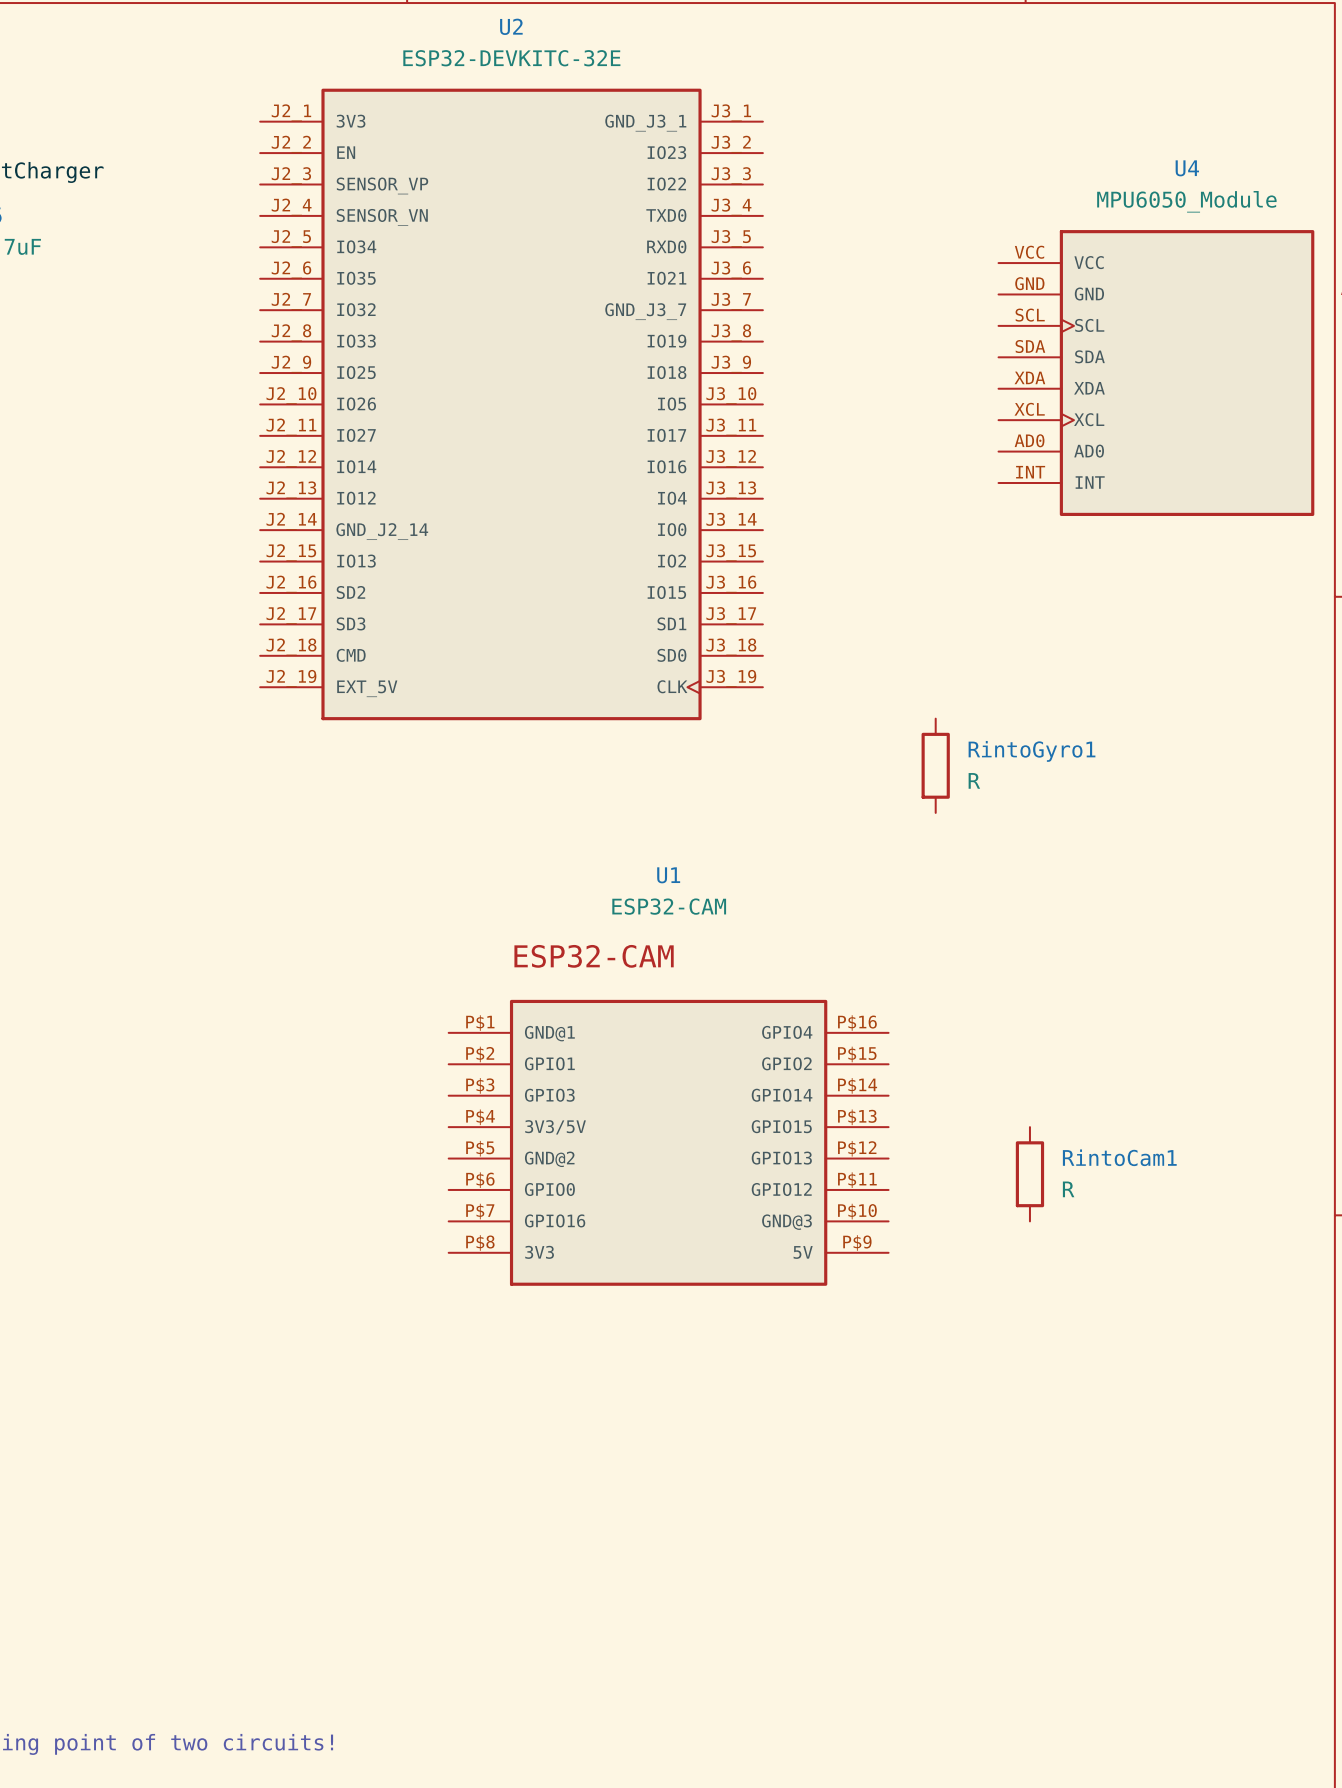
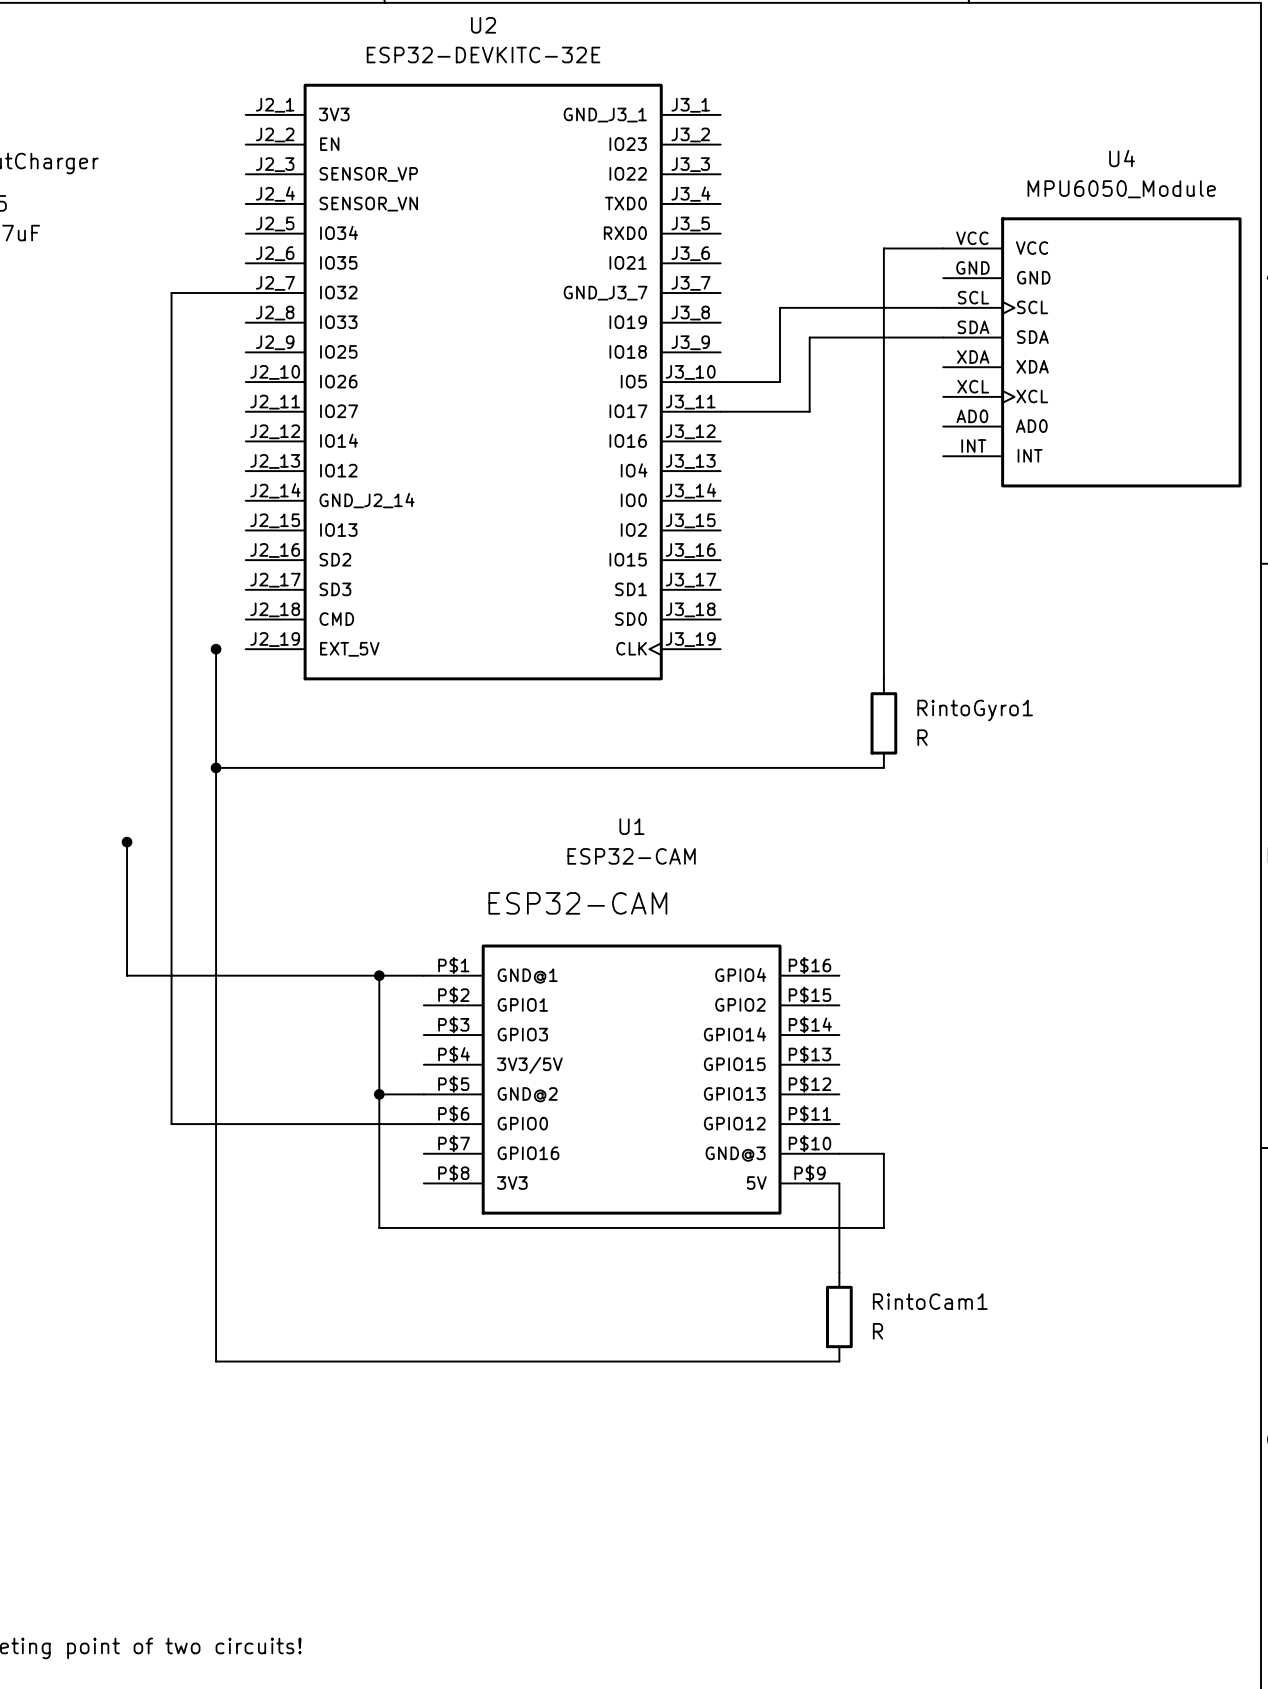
wire: none -> (943, 248) (883, 248) (883, 678)
wire: none -> (245, 293) (171, 293) (171, 1124) (423, 1124)
wire: none -> (943, 307) (780, 307) (780, 382) (720, 382)
wire: none -> (943, 337) (809, 337) (809, 411) (720, 411)
wire: none -> (216, 649) (216, 1361) (839, 1361)
junction: none -> (216, 649)
wire: none -> (216, 767) (883, 767)
junction: none -> (216, 767)
wire: none -> (127, 842) (127, 975) (423, 975)
junction: none -> (127, 842)
wire: none -> (379, 975) (379, 1227) (883, 1227) (883, 1153) (839, 1153)
junction: none -> (379, 975)
wire: none -> (379, 1094) (423, 1094)
junction: none -> (379, 1094)
RintoCam1 position: (1029, 1174) -> (839, 1317)
wire: none -> (839, 1183) (839, 1272)

